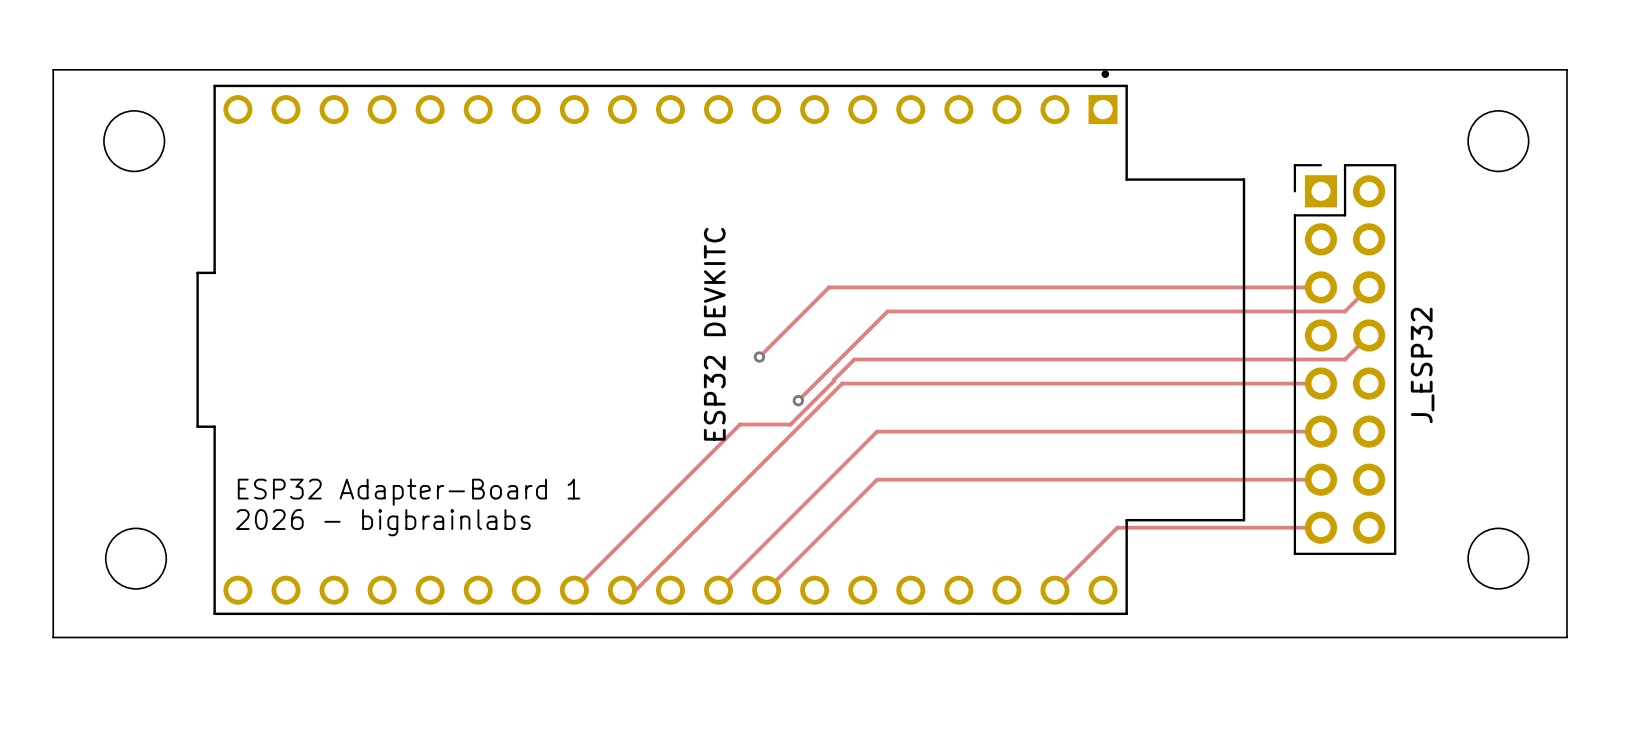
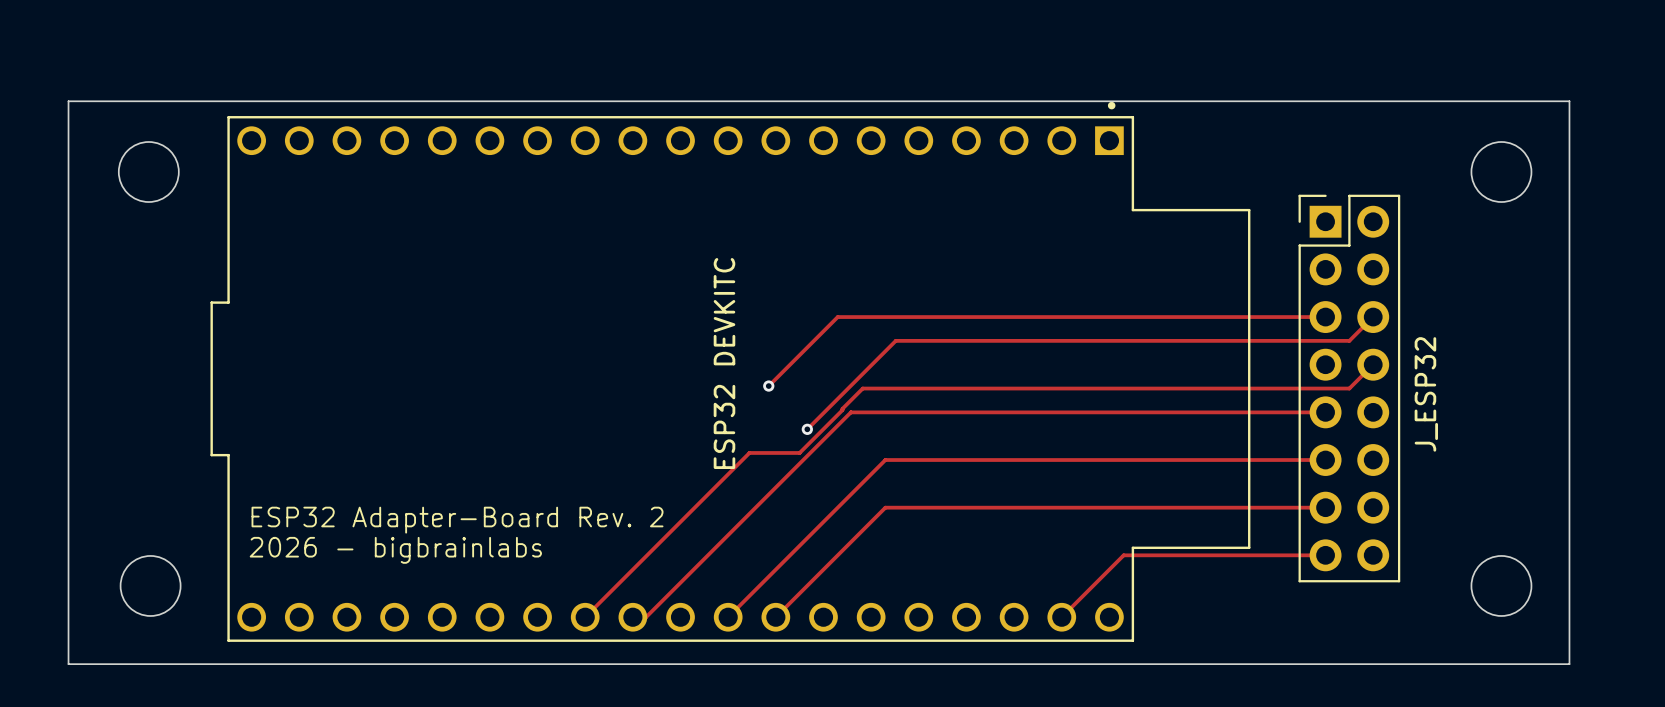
text: ESP32 Adapter-Board 1 (409, 492) -> ESP32 Adapter-Board Rev. 2 (457, 520)

